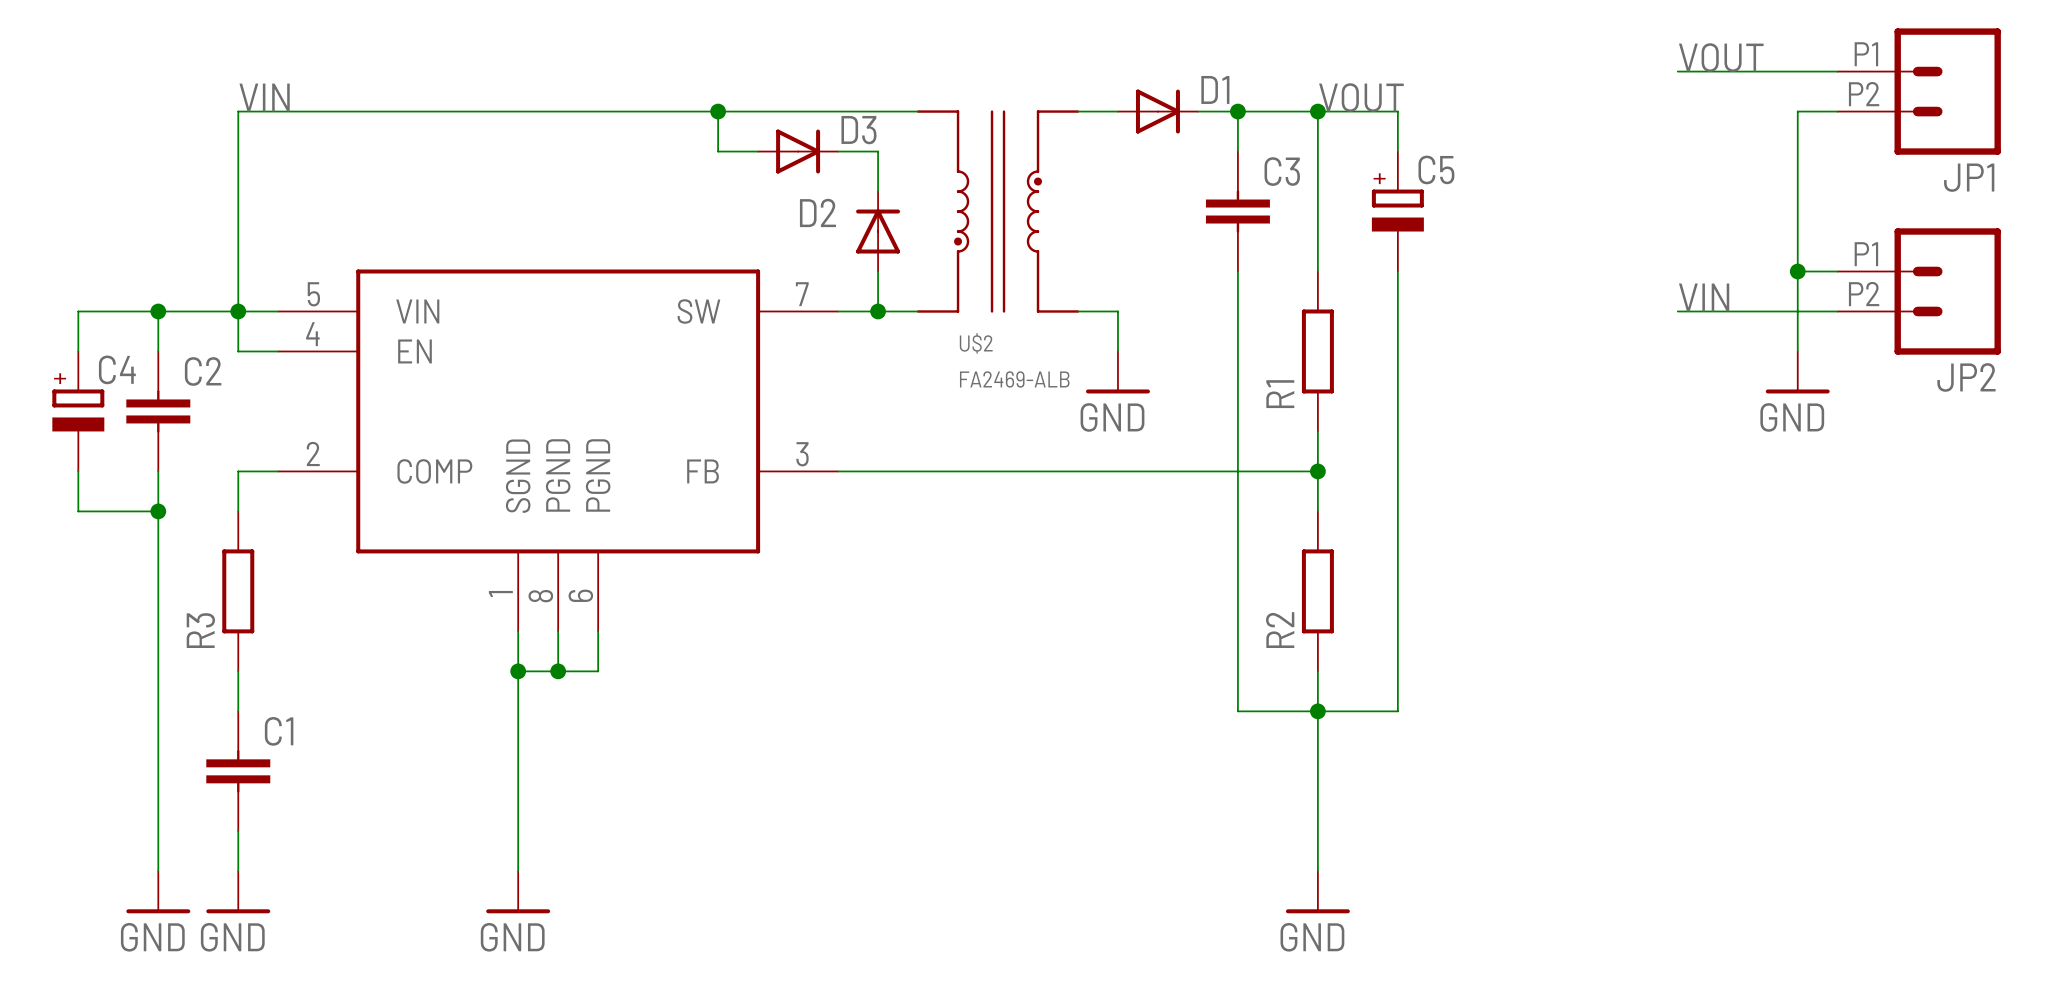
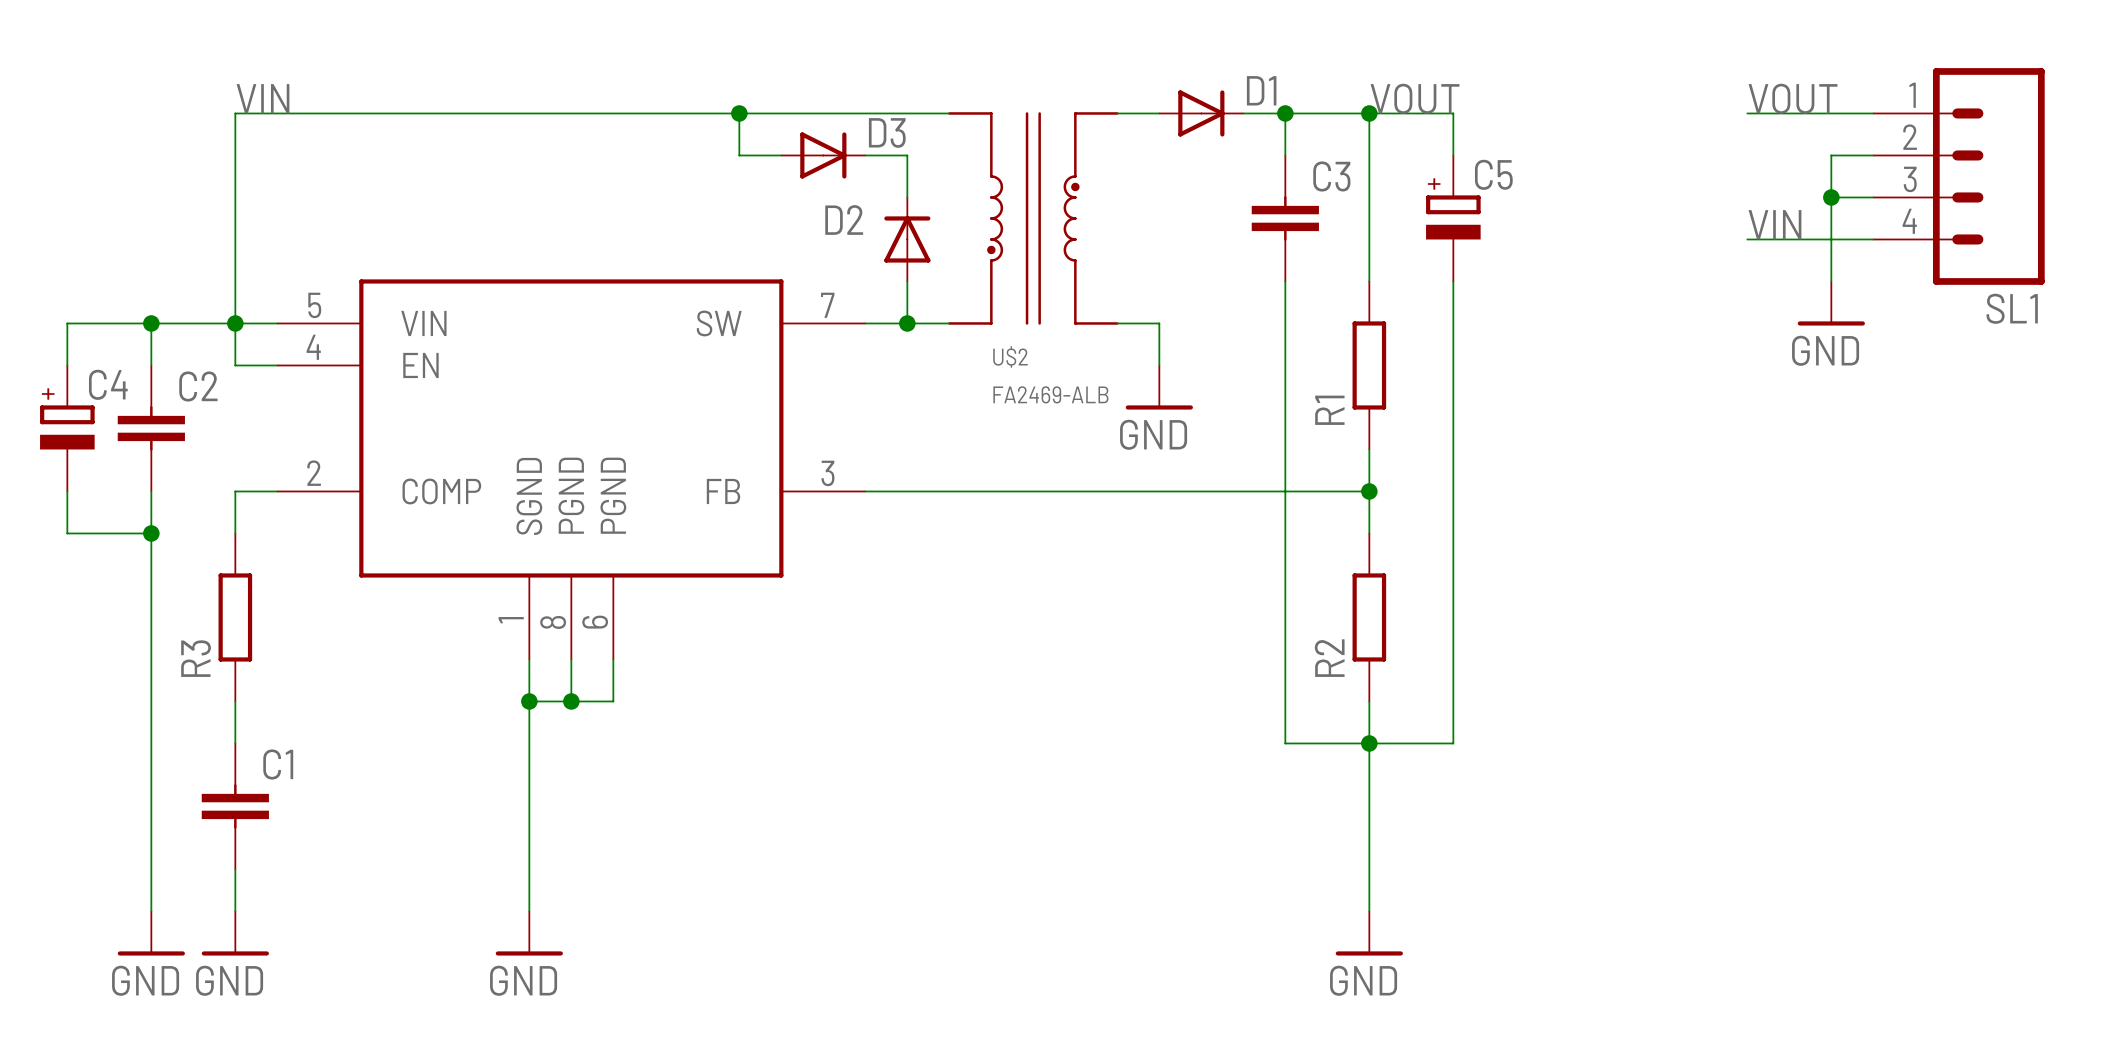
label position: VOUT (1721, 57) -> VOUT (1793, 98)
wire: (1677, 71) (1837, 71) -> none
JP1: (1919, 91) -> none
wire: none -> (1747, 113) (1873, 113)
wire: (1837, 111) (1797, 111) (1797, 351) -> none
wire: none -> (1873, 155) (1831, 155) (1831, 281)
SL1: none -> (1959, 176)
wire: none -> (1747, 239) (1873, 239)
wire: (1797, 271) (1837, 271) -> (1831, 197) (1873, 197)
junction position: (1797, 271) -> (1831, 197)
JP2: (1919, 291) -> none
label position: VIN (1704, 297) -> VIN (1775, 224)
wire: (1677, 311) (1837, 311) -> none
power symbol position: GND (1797, 372) -> GND (1831, 303)

